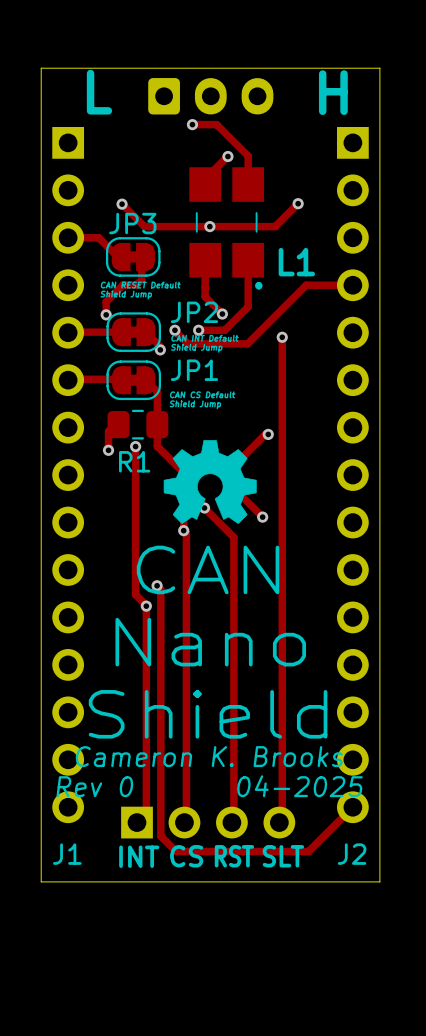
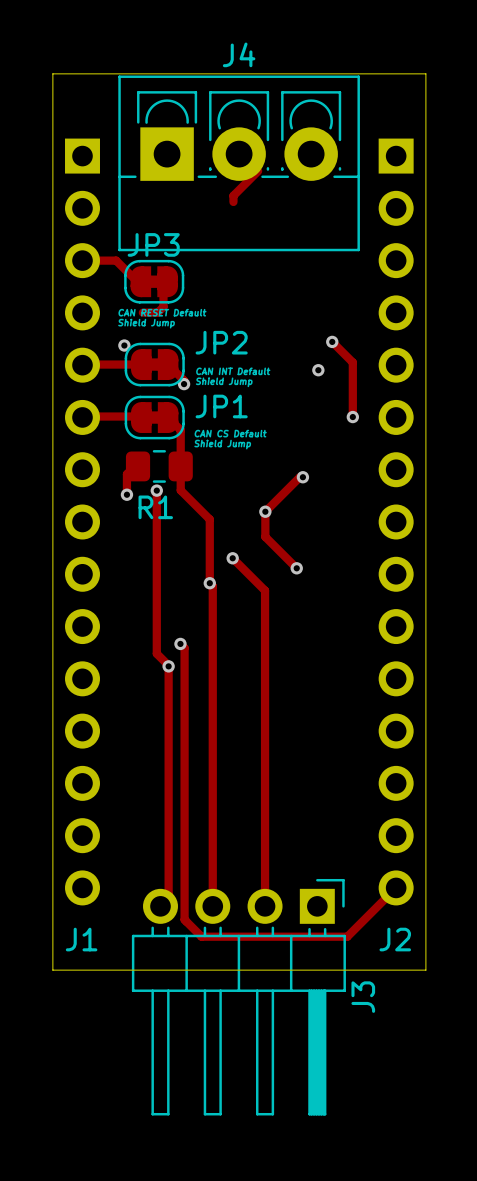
text: L (99, 92) -> none
text: H (333, 92) -> none
part: (210, 96) -> none
track: (192, 124) (216, 124) (248, 156) (248, 184) -> none
via: (192, 124) -> none
J4: none -> (239, 163)
via: (227, 156) -> none
track: (298, 203) (275, 226) (144, 226) (122, 204) -> none
via: (298, 203) -> none
via: (122, 204) -> none
via: (209, 226) -> none
L1: (226, 228) -> none
track: (205, 260) (205, 296) (222, 314) -> none
track: (248, 260) (248, 306) (224, 330) (198, 330) -> none
track: (122, 285) (106, 301) (106, 314) -> none
track: (352, 285) (306, 285) (247, 343) (187, 343) (174, 330) -> none
track: none -> (332, 341) (352, 362) (352, 417)
via: none -> (332, 341)
via: (222, 314) -> none
via: (174, 330) -> none
via: (198, 330) -> none
track: (282, 337) (282, 819) (279, 822) -> none
via: none -> (352, 417)
drawing: [163, 440, 257, 524] -> none
text: CAN (208, 569) -> none
text: Nano (210, 642) -> none
text: Shield (208, 714) -> none
text: Cameron K. Brooks (209, 756) -> none
text: Rev 0 04-2025 (209, 786) -> none
J3 side: bottom (208, 822) -> top (238, 997)
text: INT (139, 856) -> none
text: CS (186, 856) -> none
text: RST (234, 856) -> none
text: SLT (283, 856) -> none

